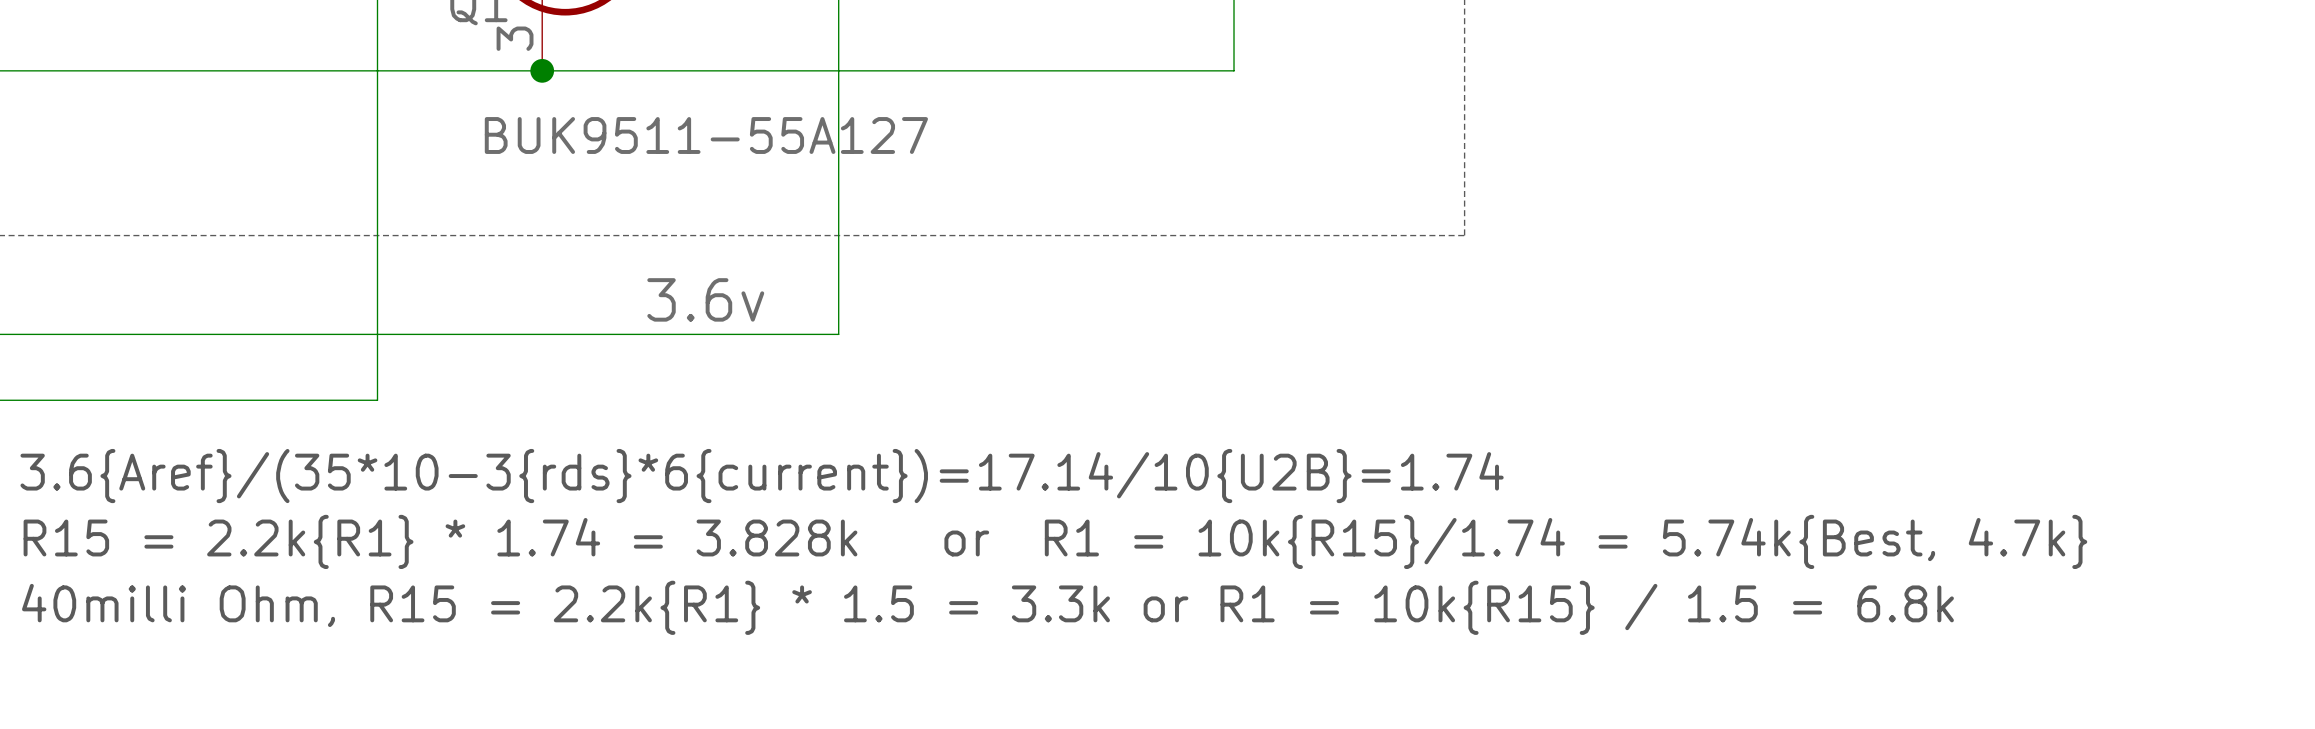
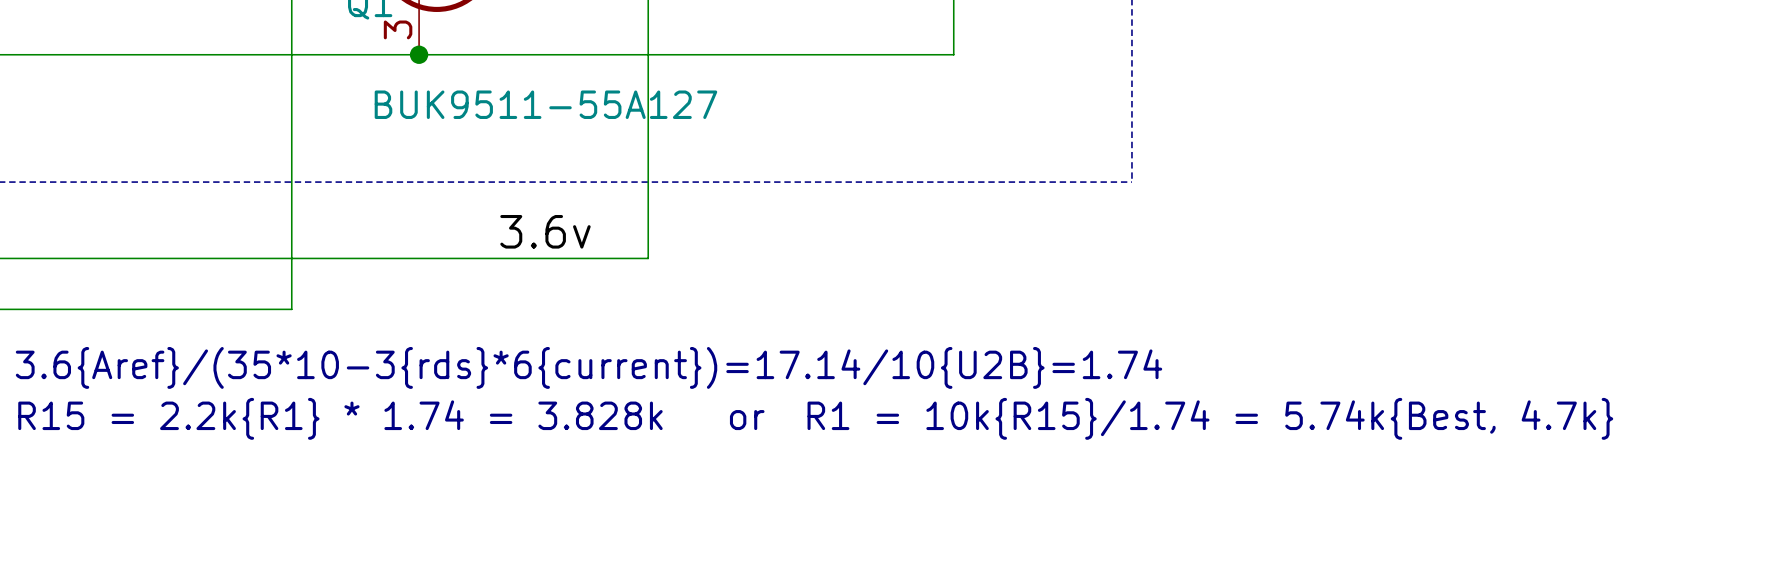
text: 40milli Ohm, R15 = 2.2k{R1} * 1.5 = 3.3k or R1 = 10k{R15} / 1.5 = 6.8k (987, 607) -> none

